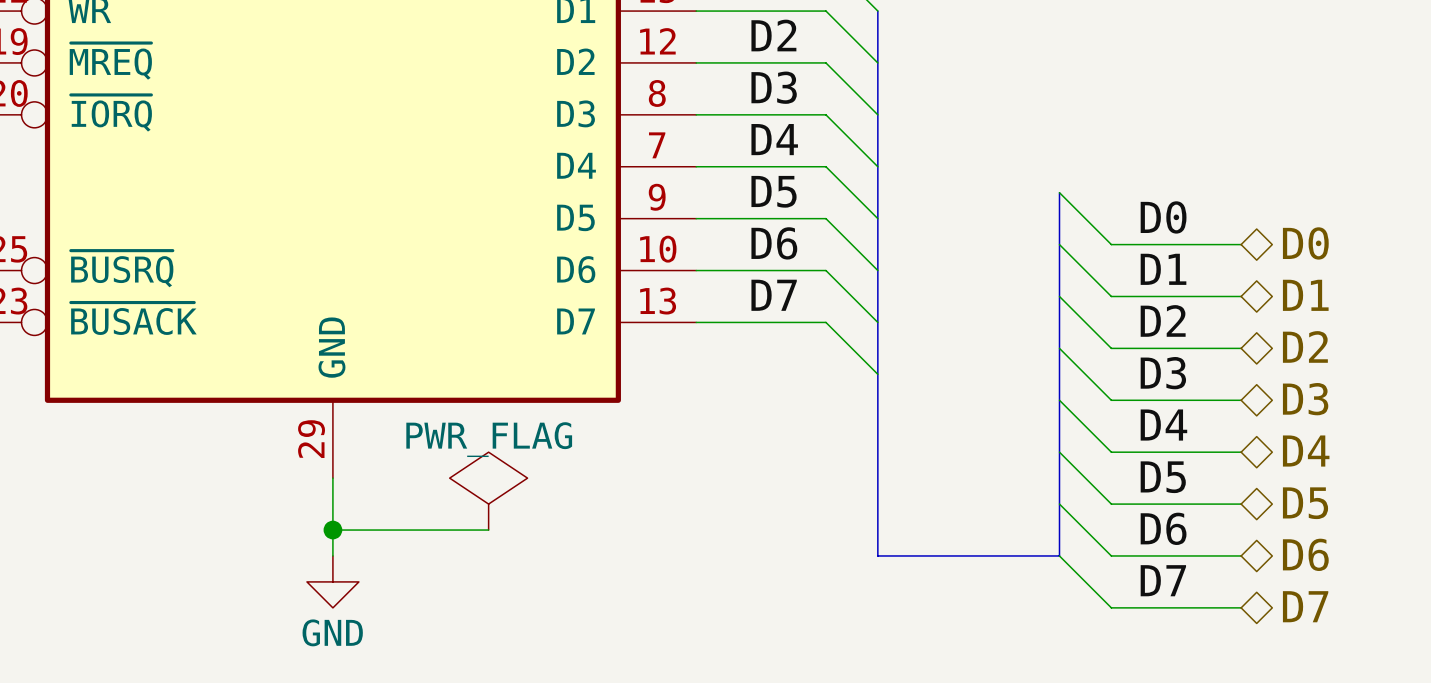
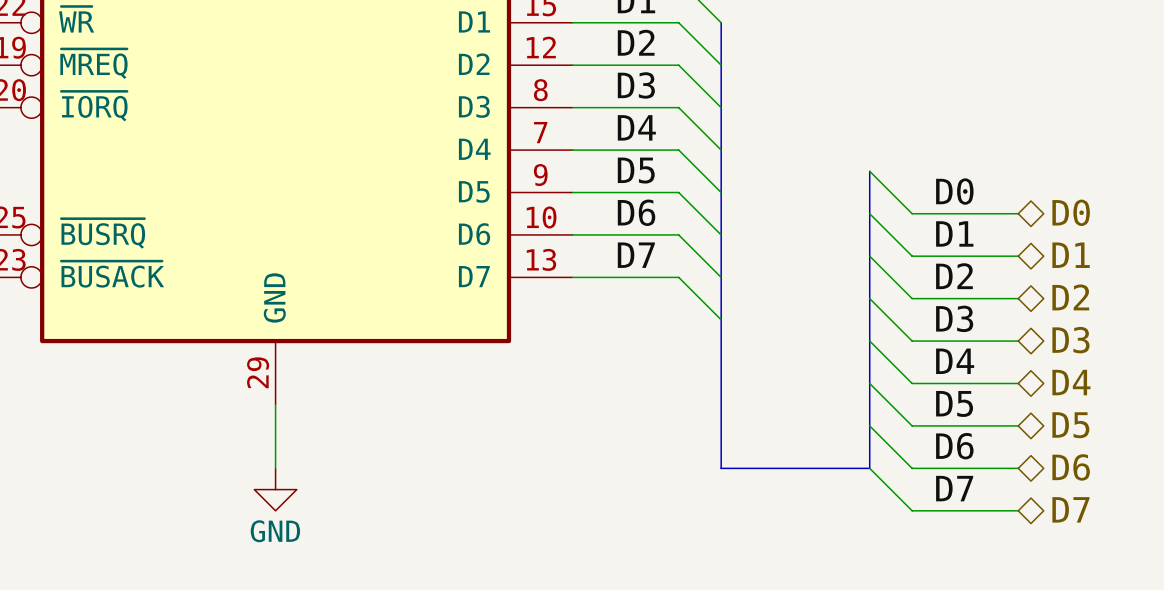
power symbol: PWR_FLAG (488, 491) -> none
wire: (332, 530) (488, 530) -> none
junction: (332, 530) -> none

